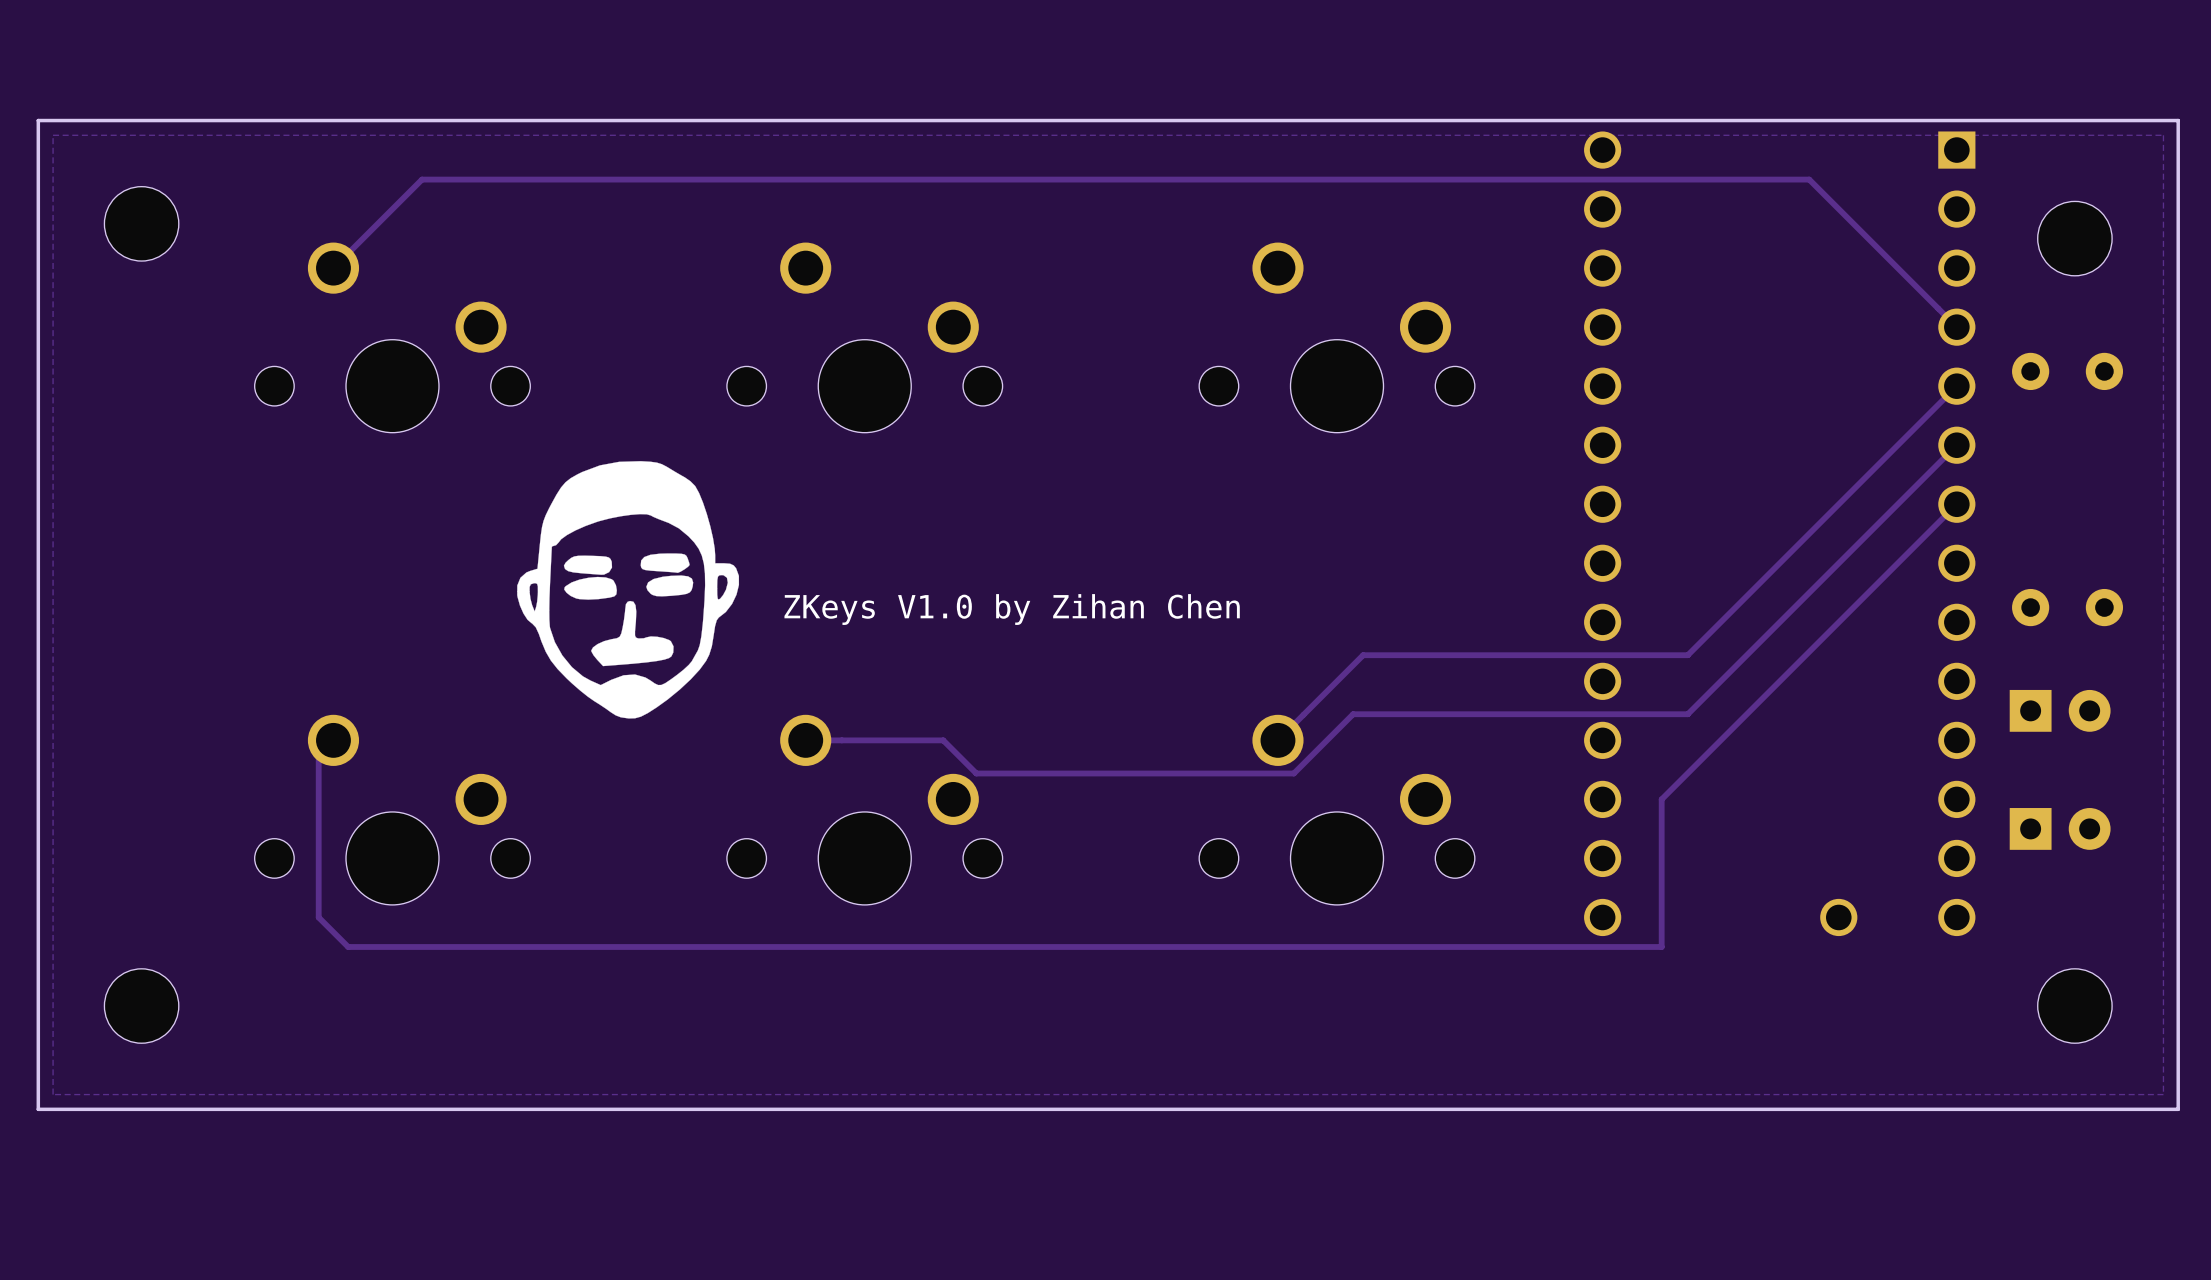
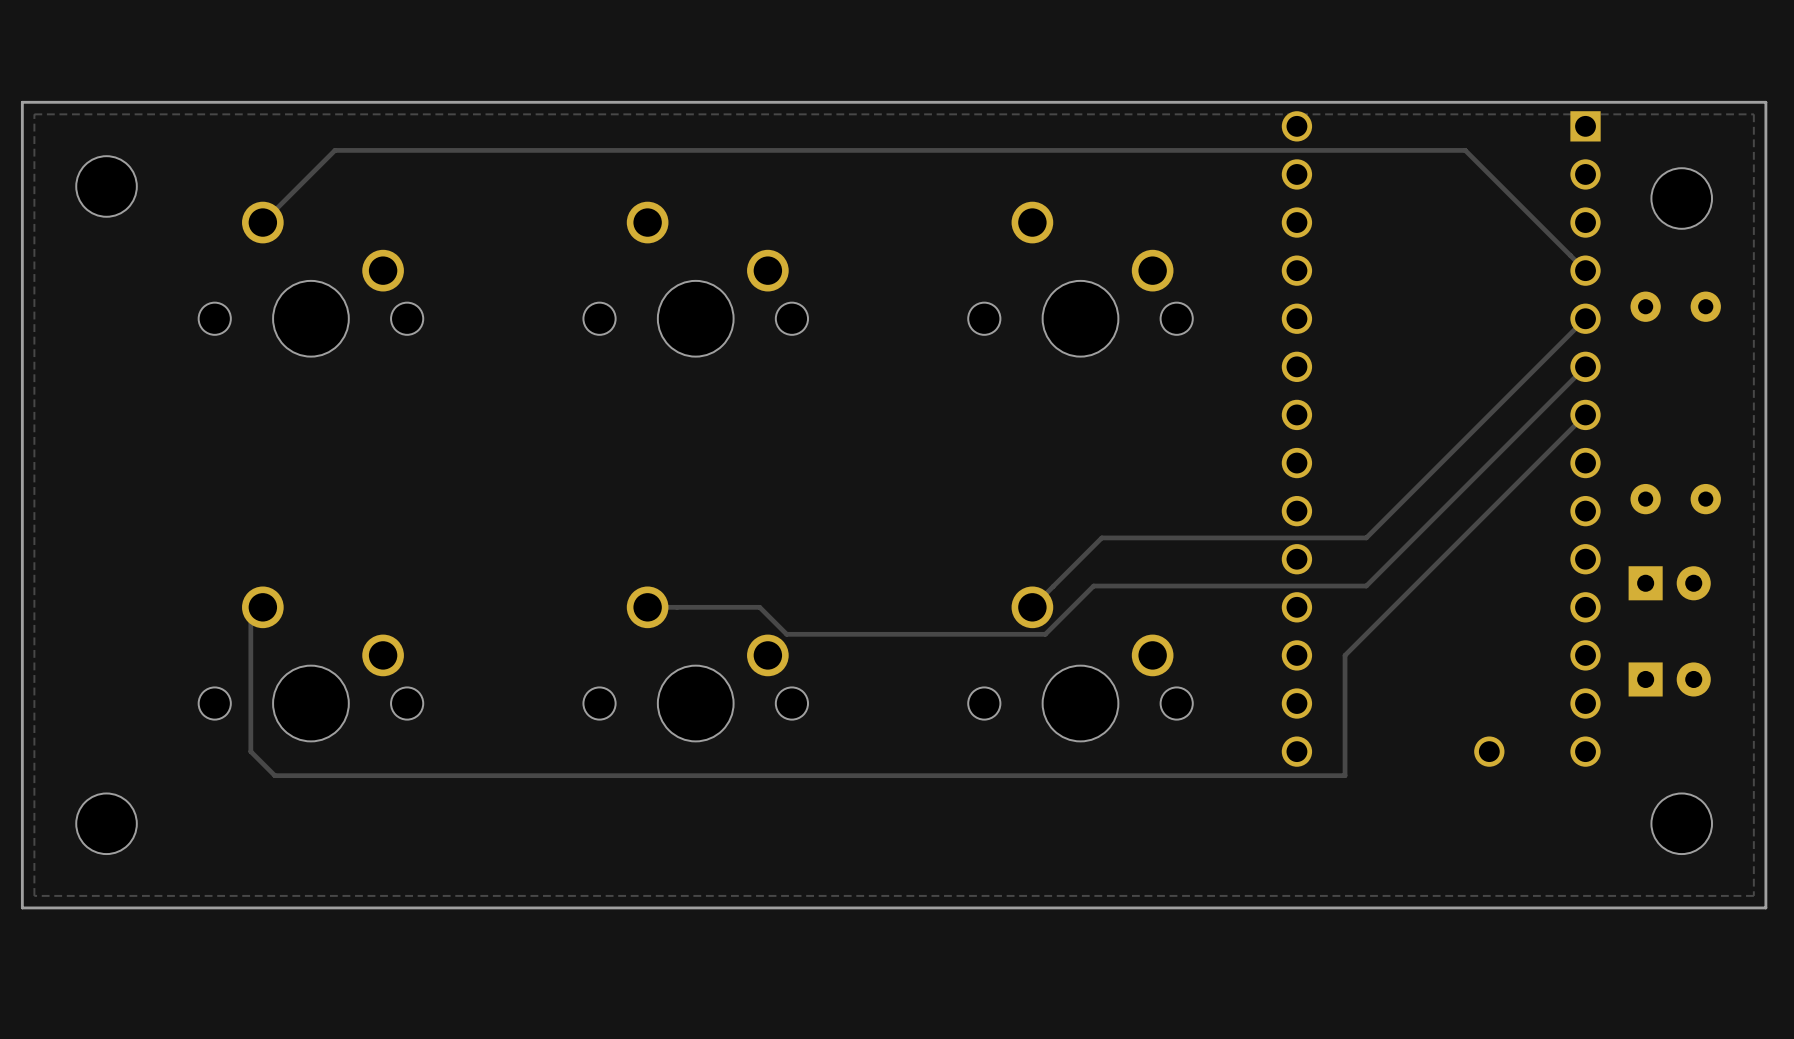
drawing: [517, 461, 740, 719] -> none
text: ZKeys V1.0 by Zihan Chen (1012, 609) -> none

